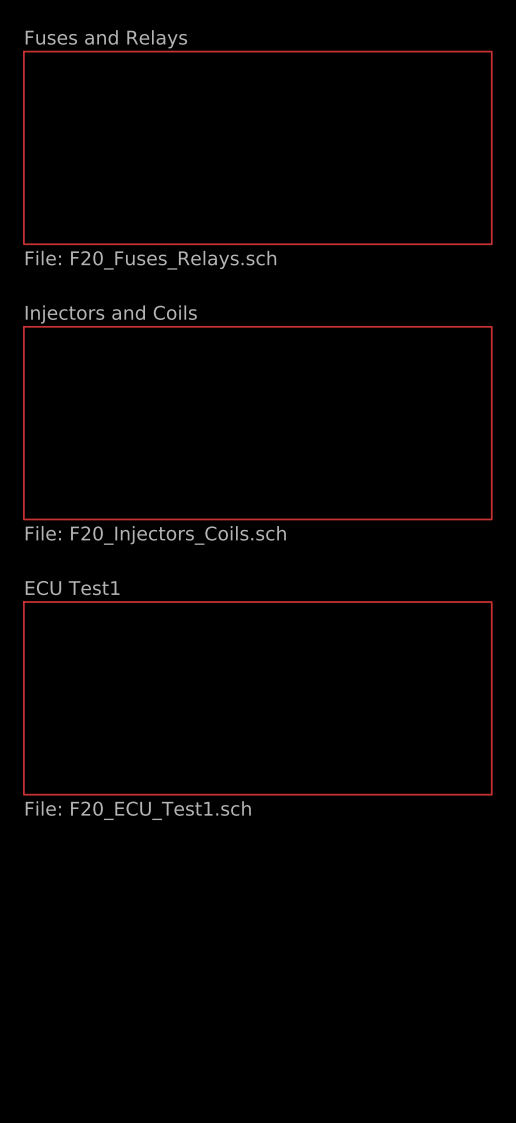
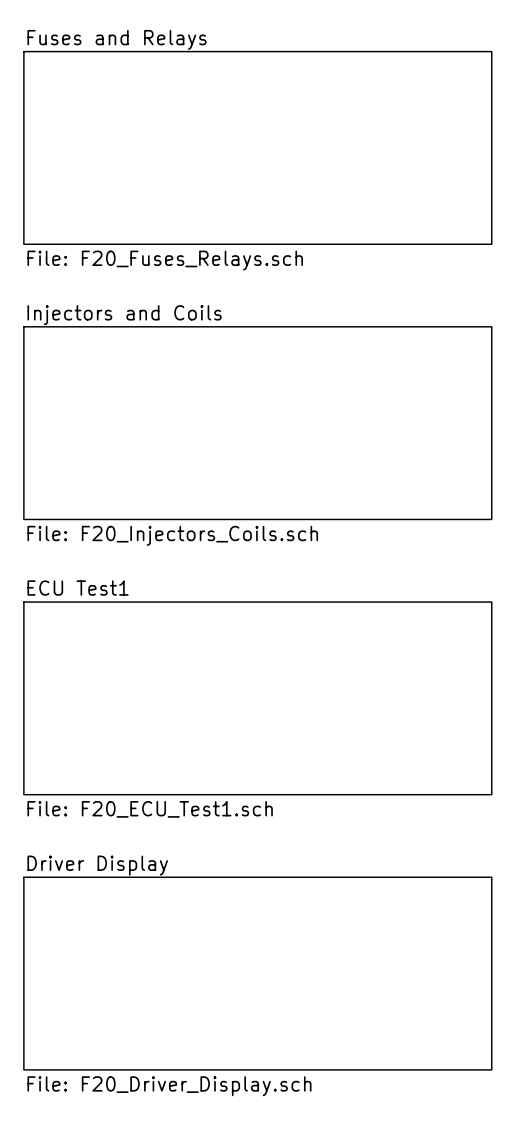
sheet Driver Display: none -> File: F20_Driver_Display.sch (257, 973)

